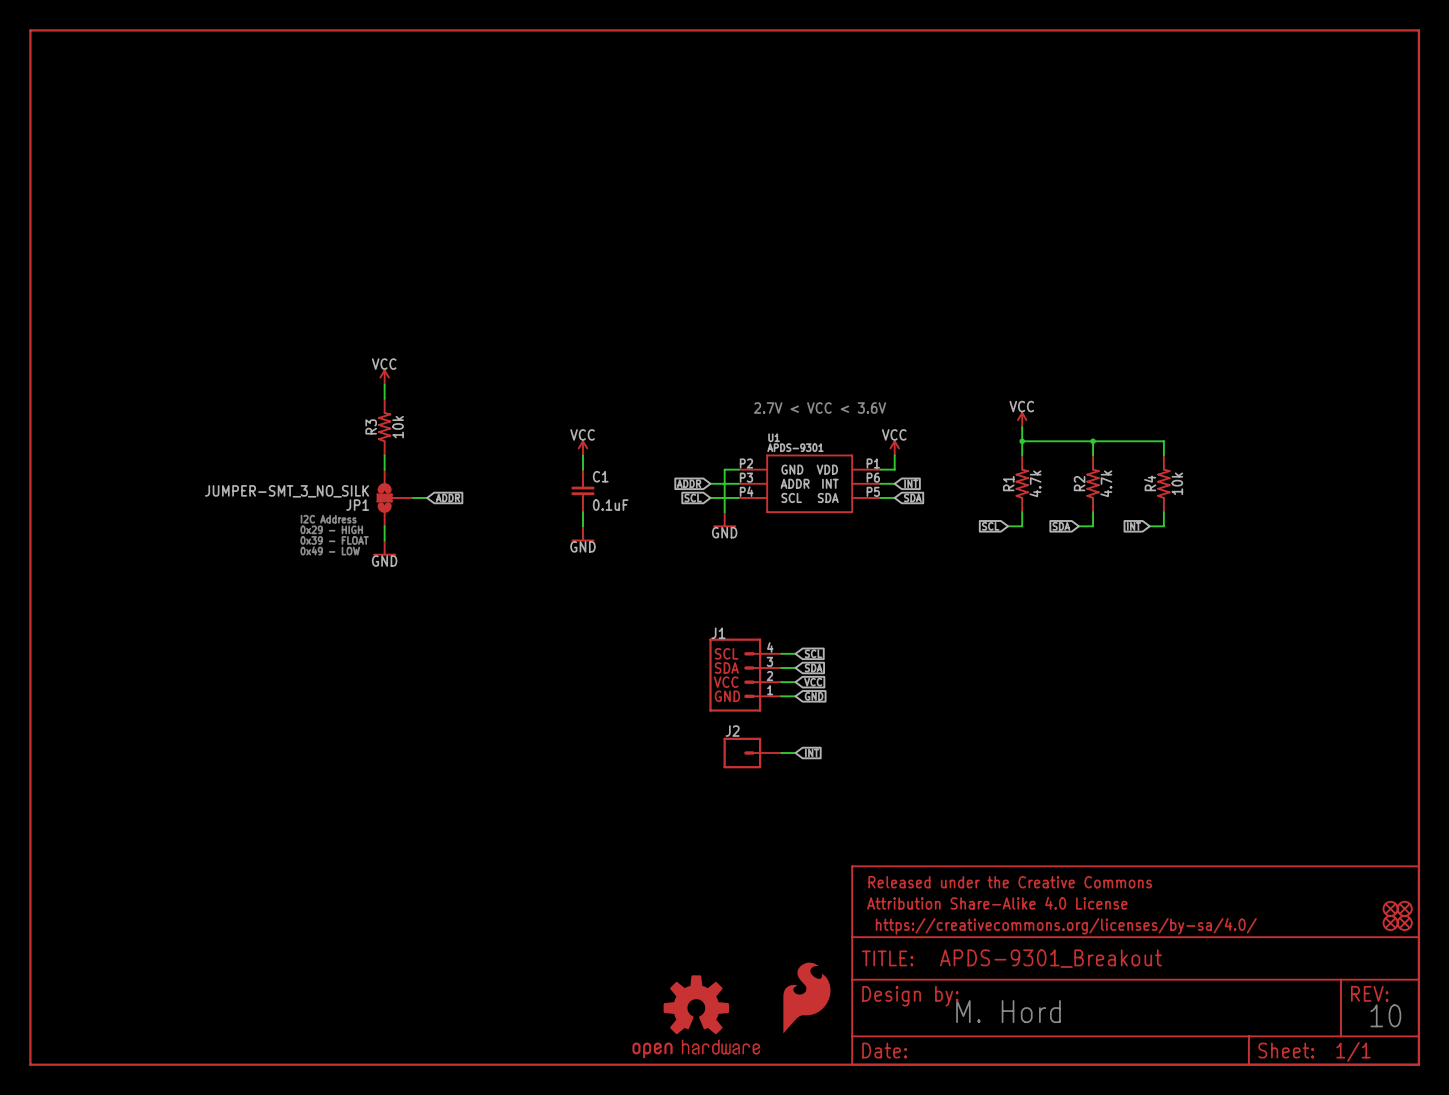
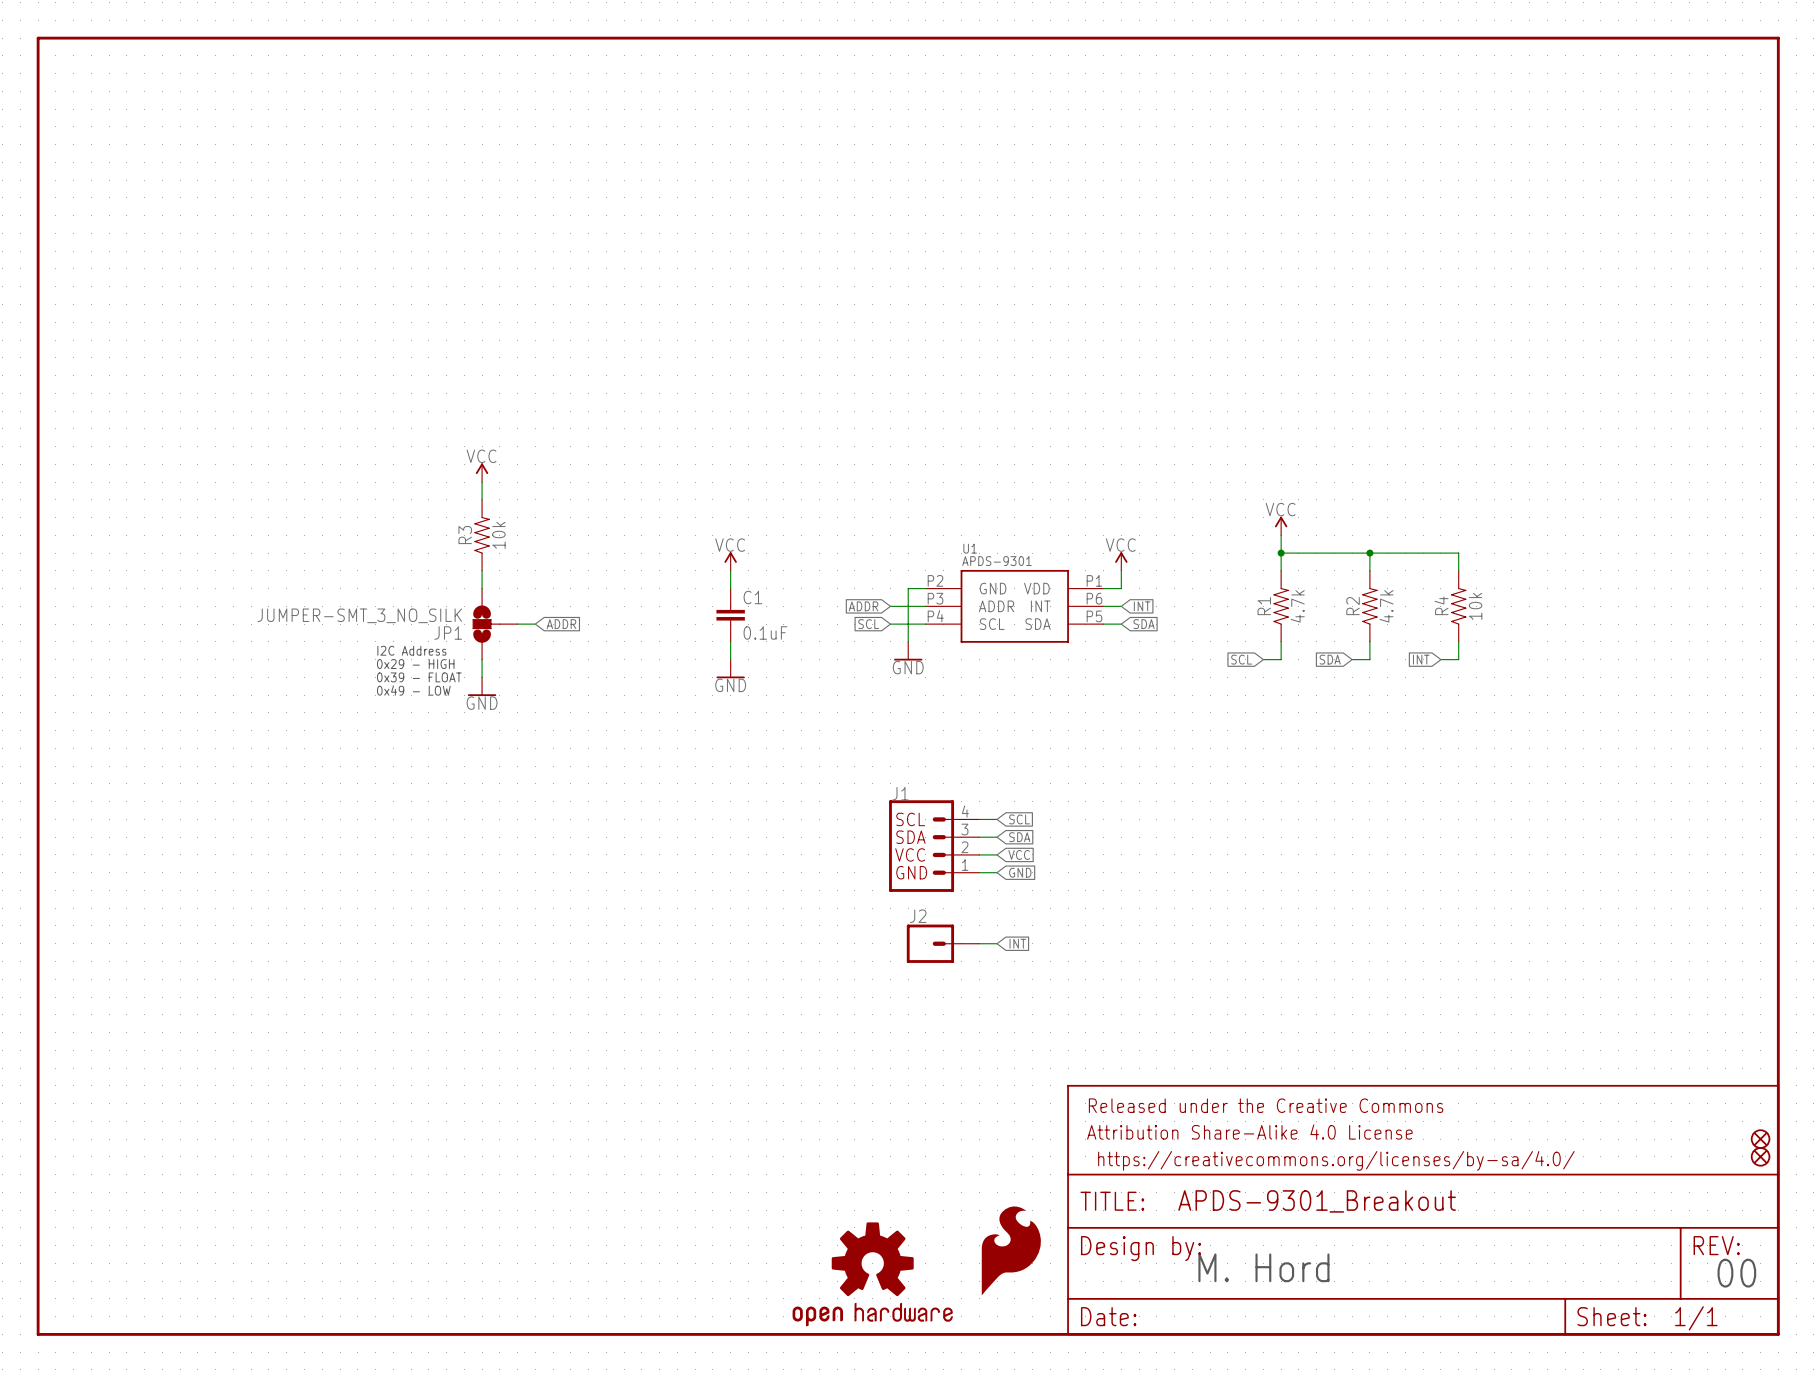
text: 2.7V < VCC < 3.6V (820, 408) -> none
part: (1390, 908) -> none
part: (1390, 923) -> none
text: 10 (1385, 1015) -> 00 (1736, 1273)

